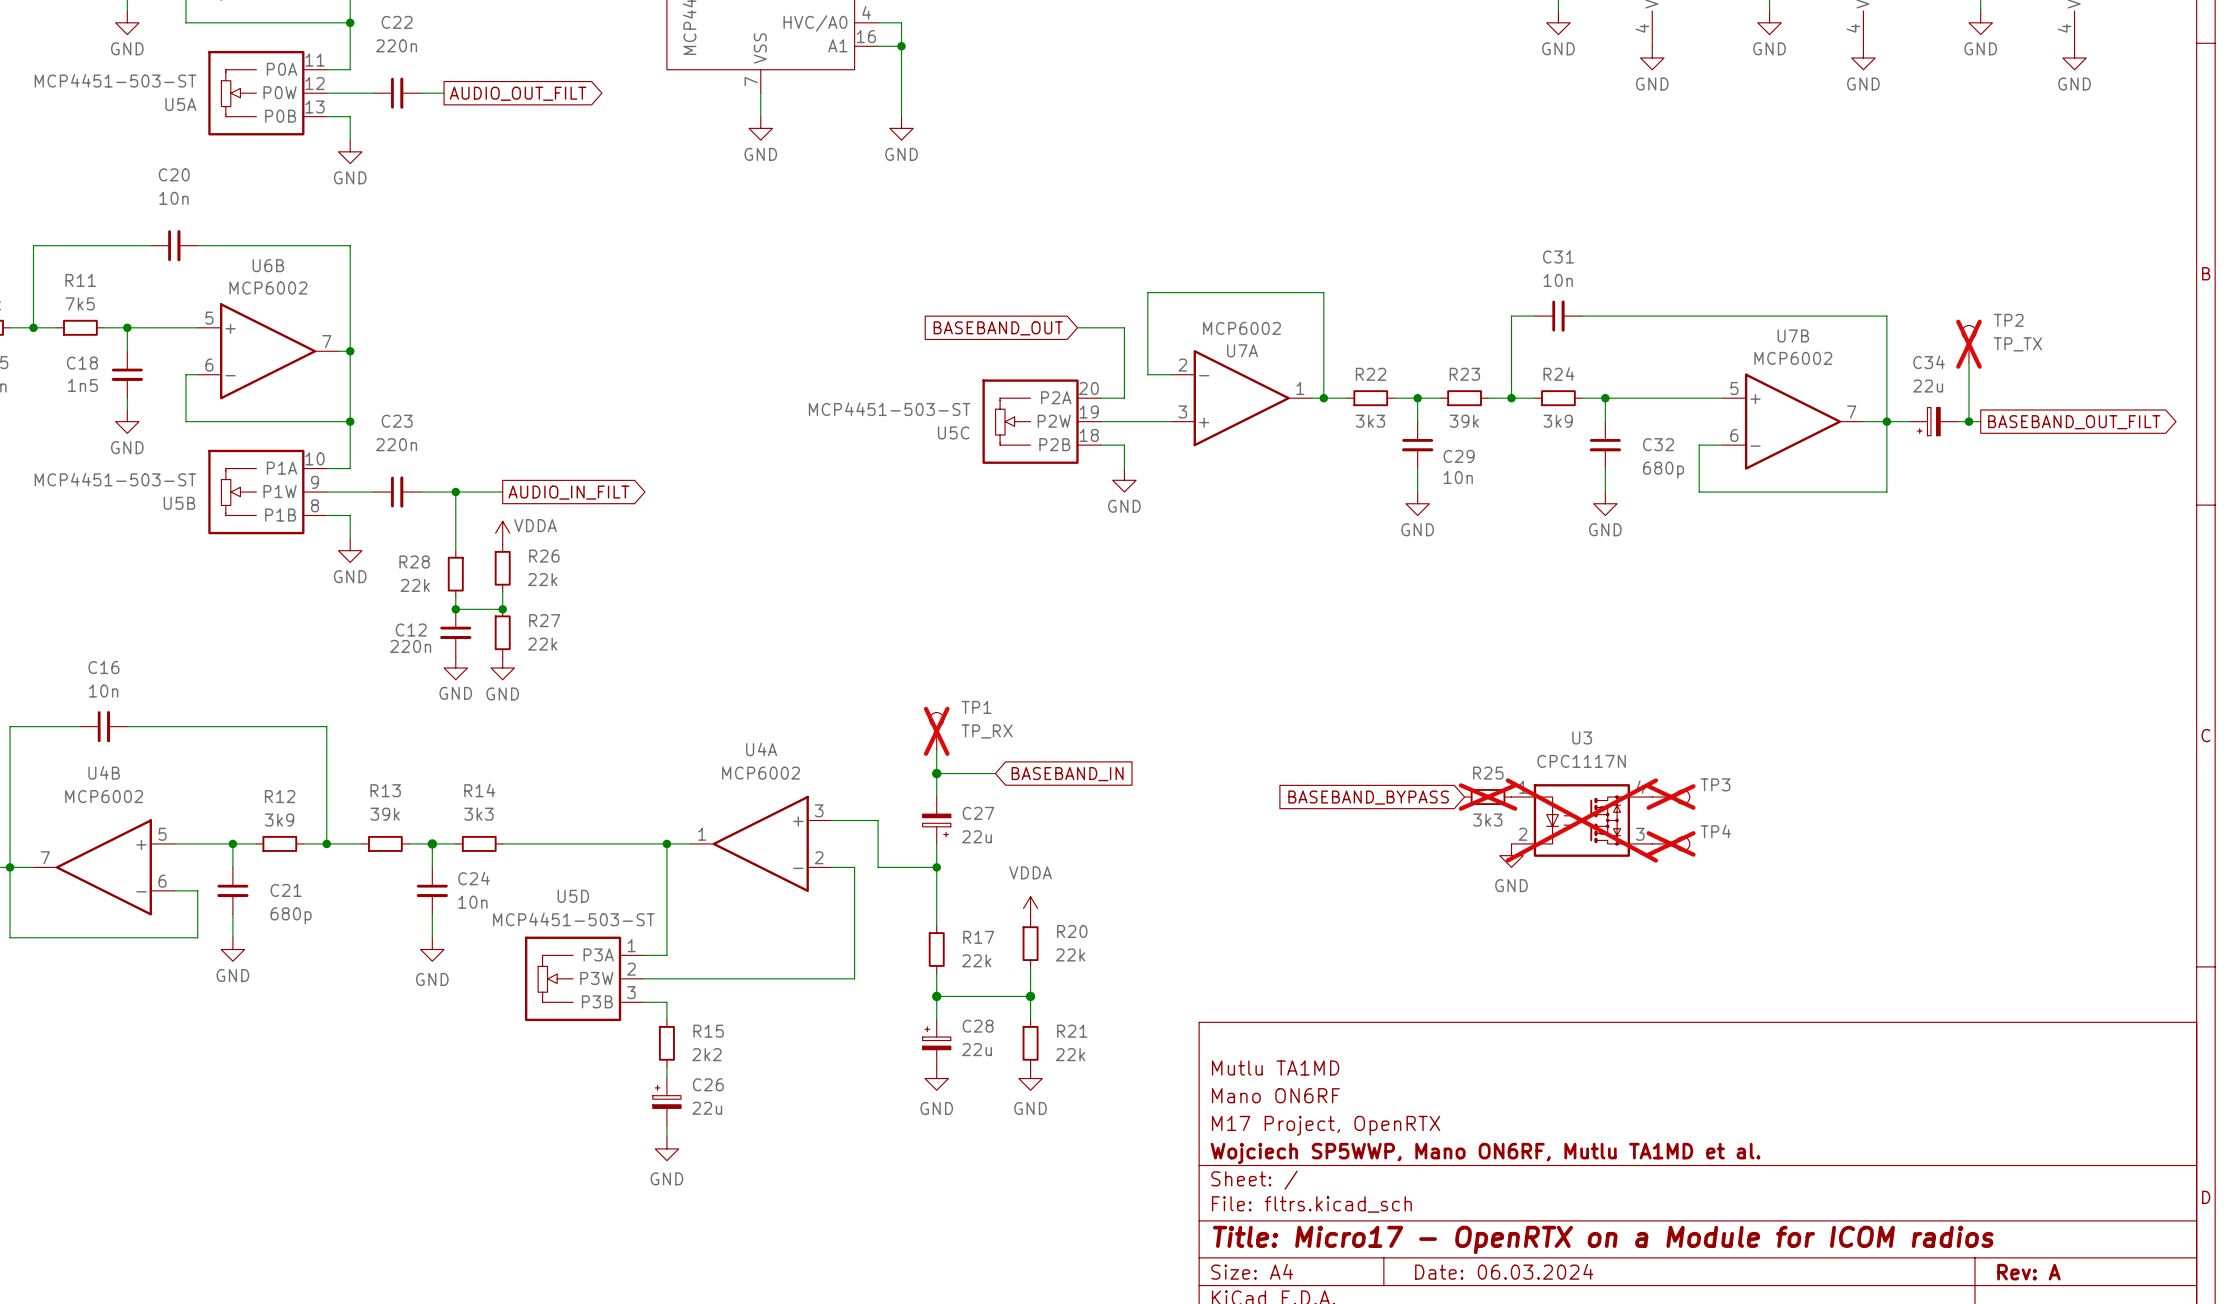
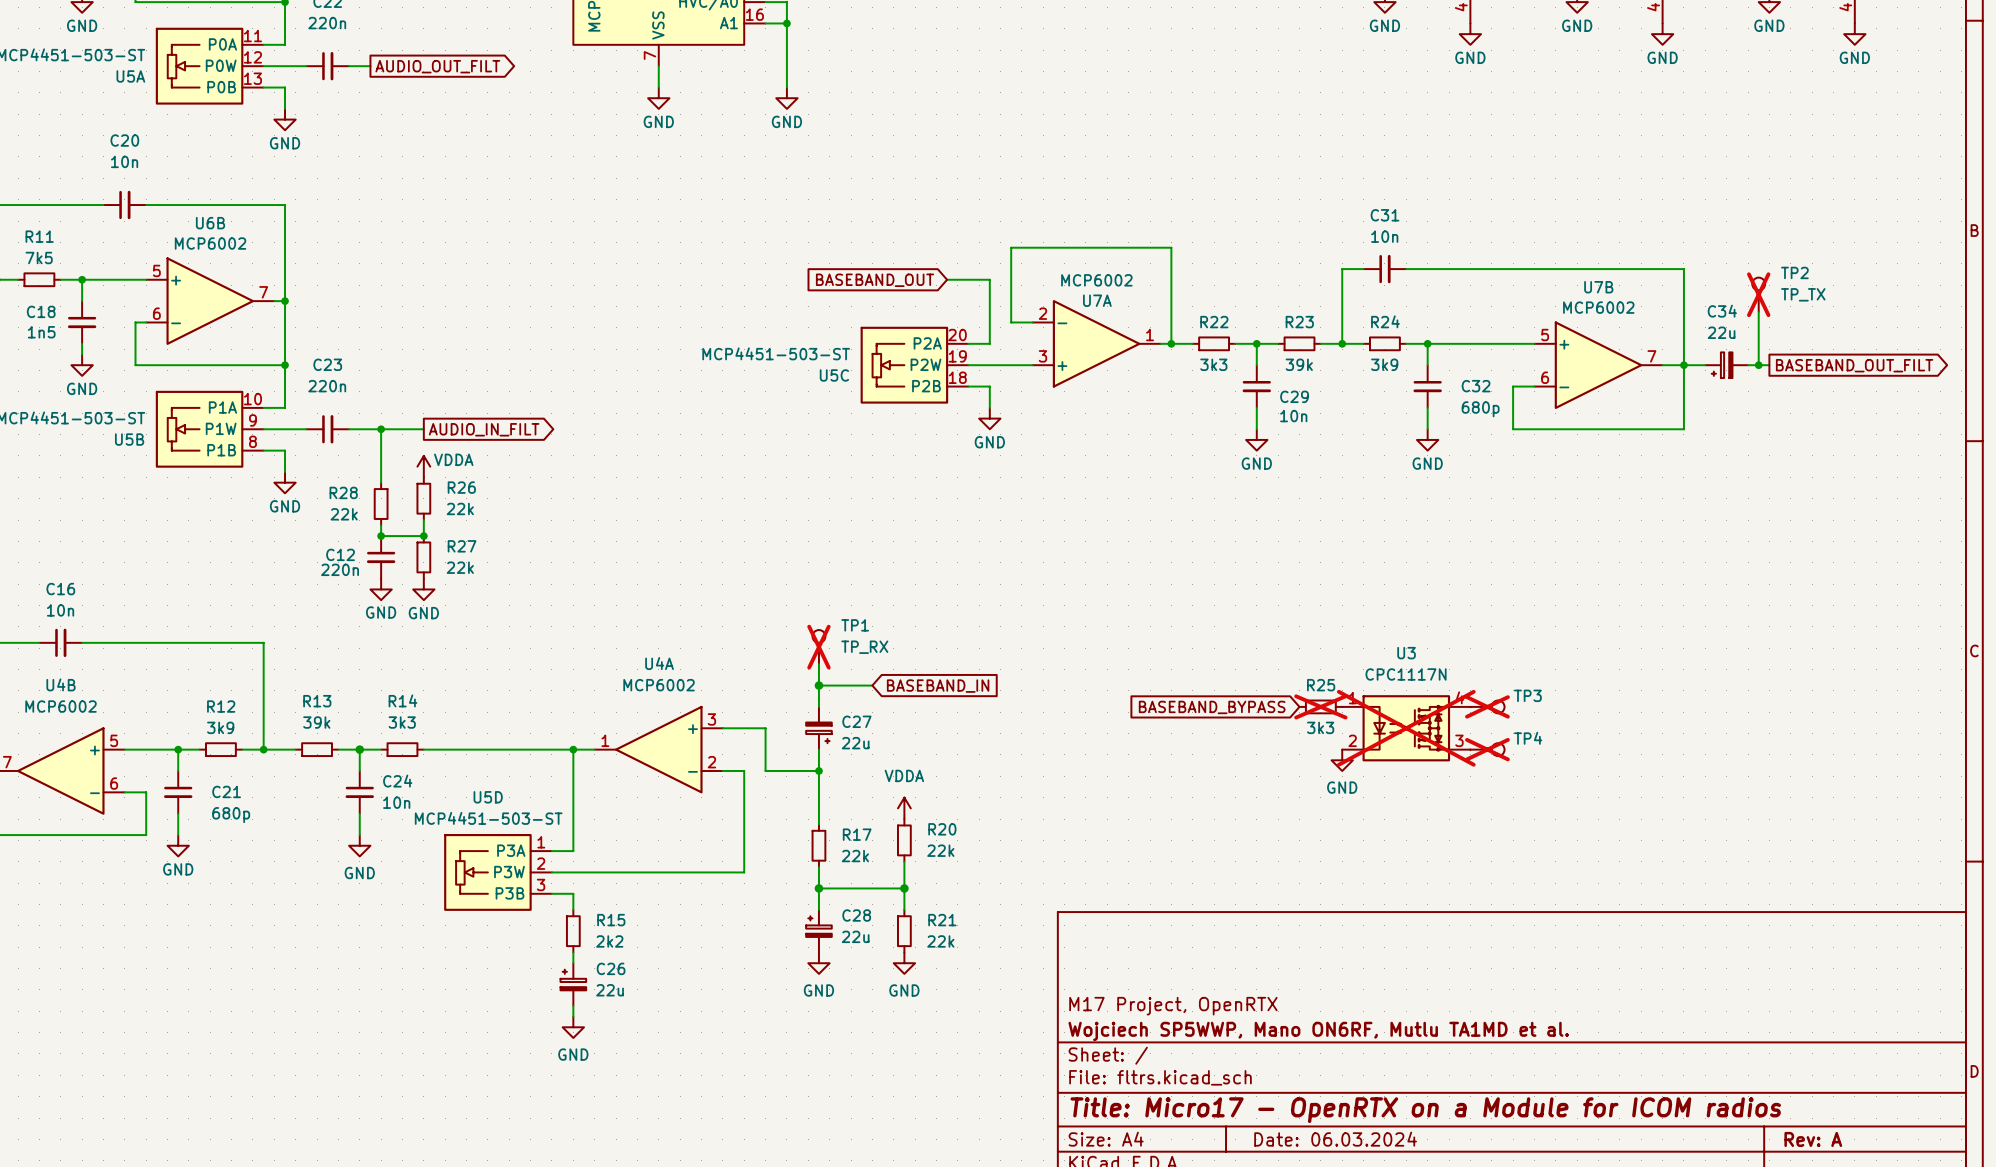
title block: Mutlu TA1MD (1275, 1068) -> none
title block: Mano ON6RF (1275, 1095) -> none

